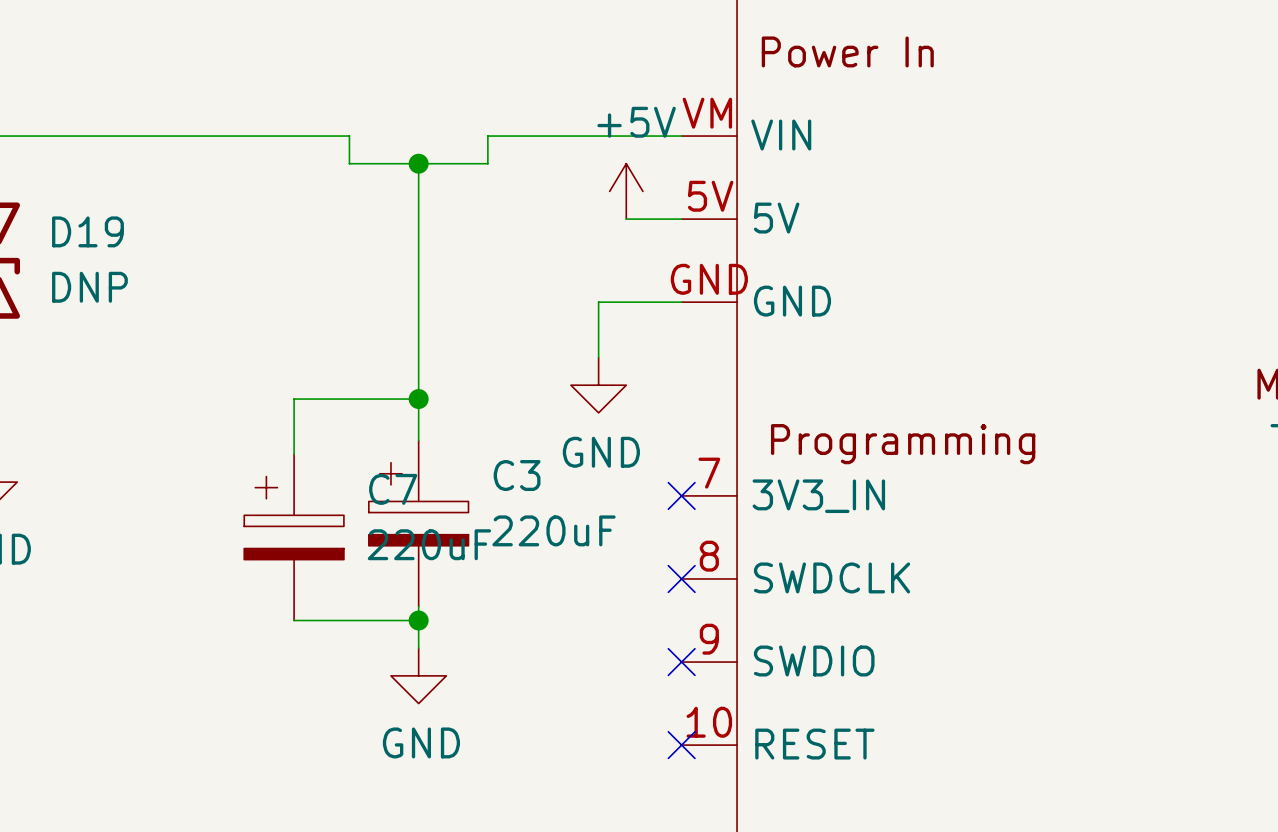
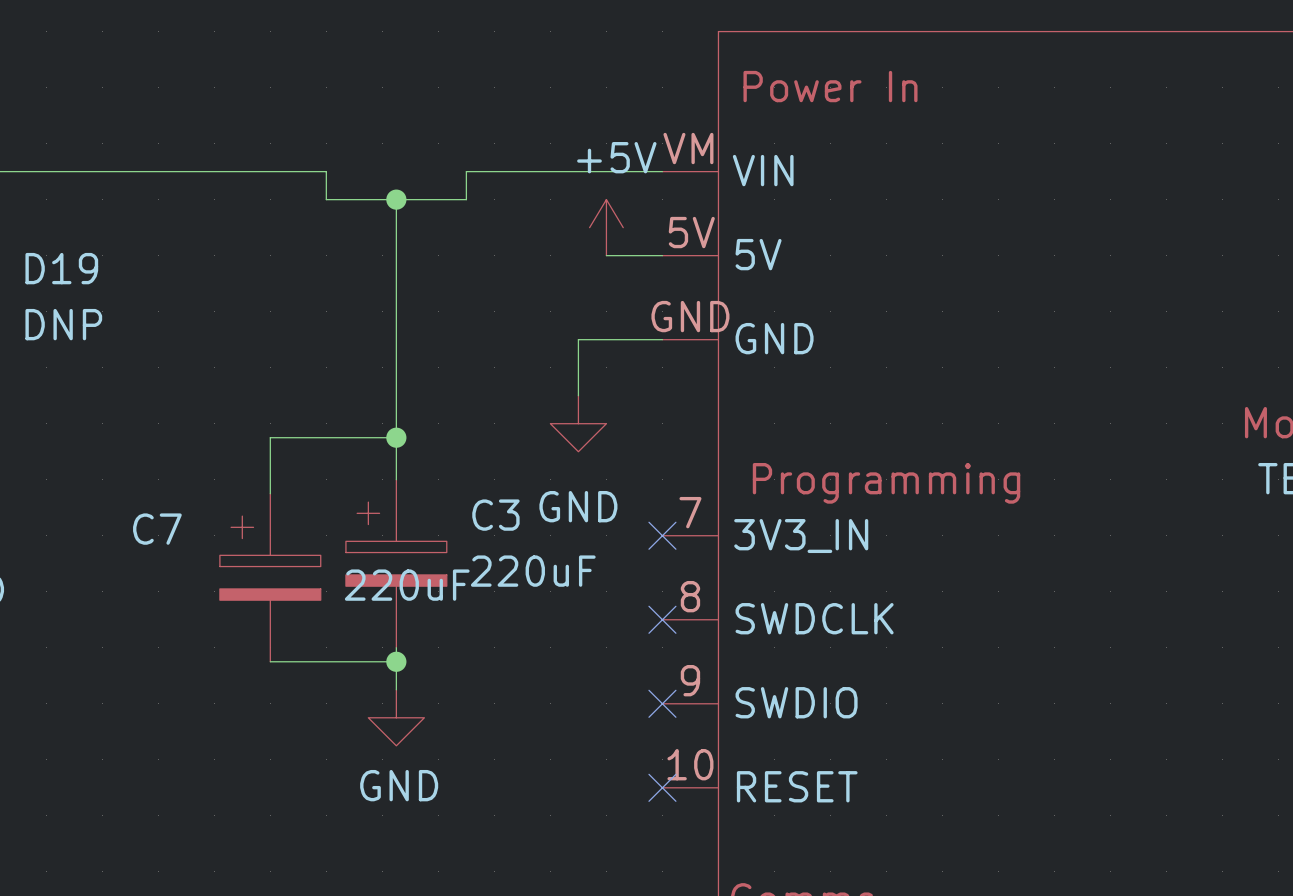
power symbol text position: GND (601, 452) -> GND (578, 506)
C7 name position: C7 (393, 489) -> C7 (157, 529)

